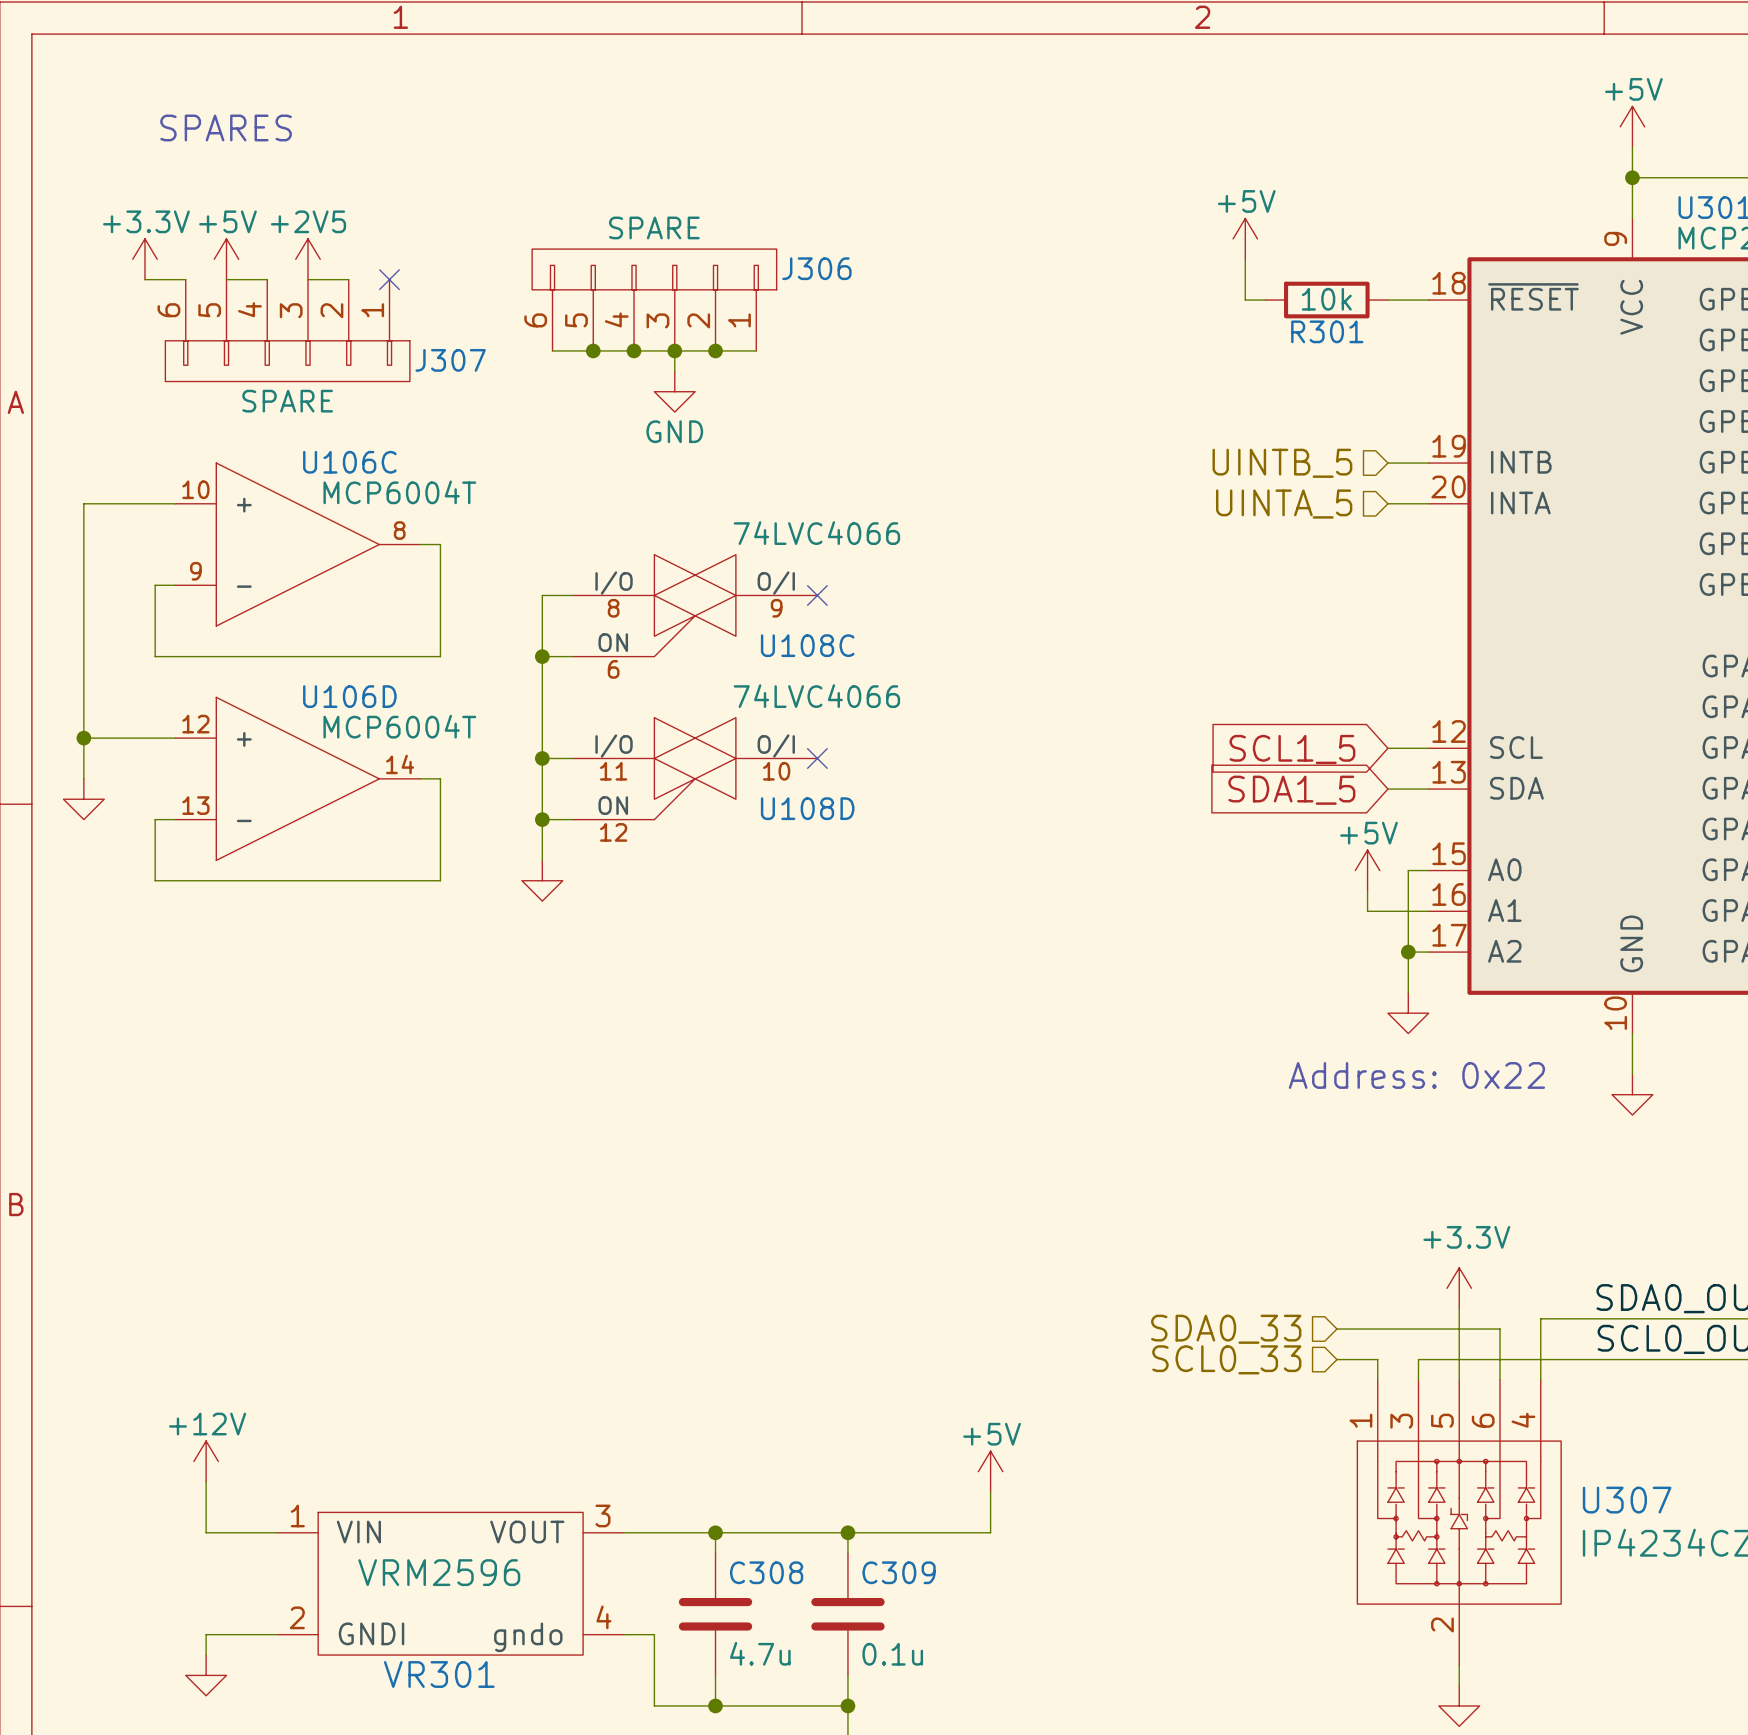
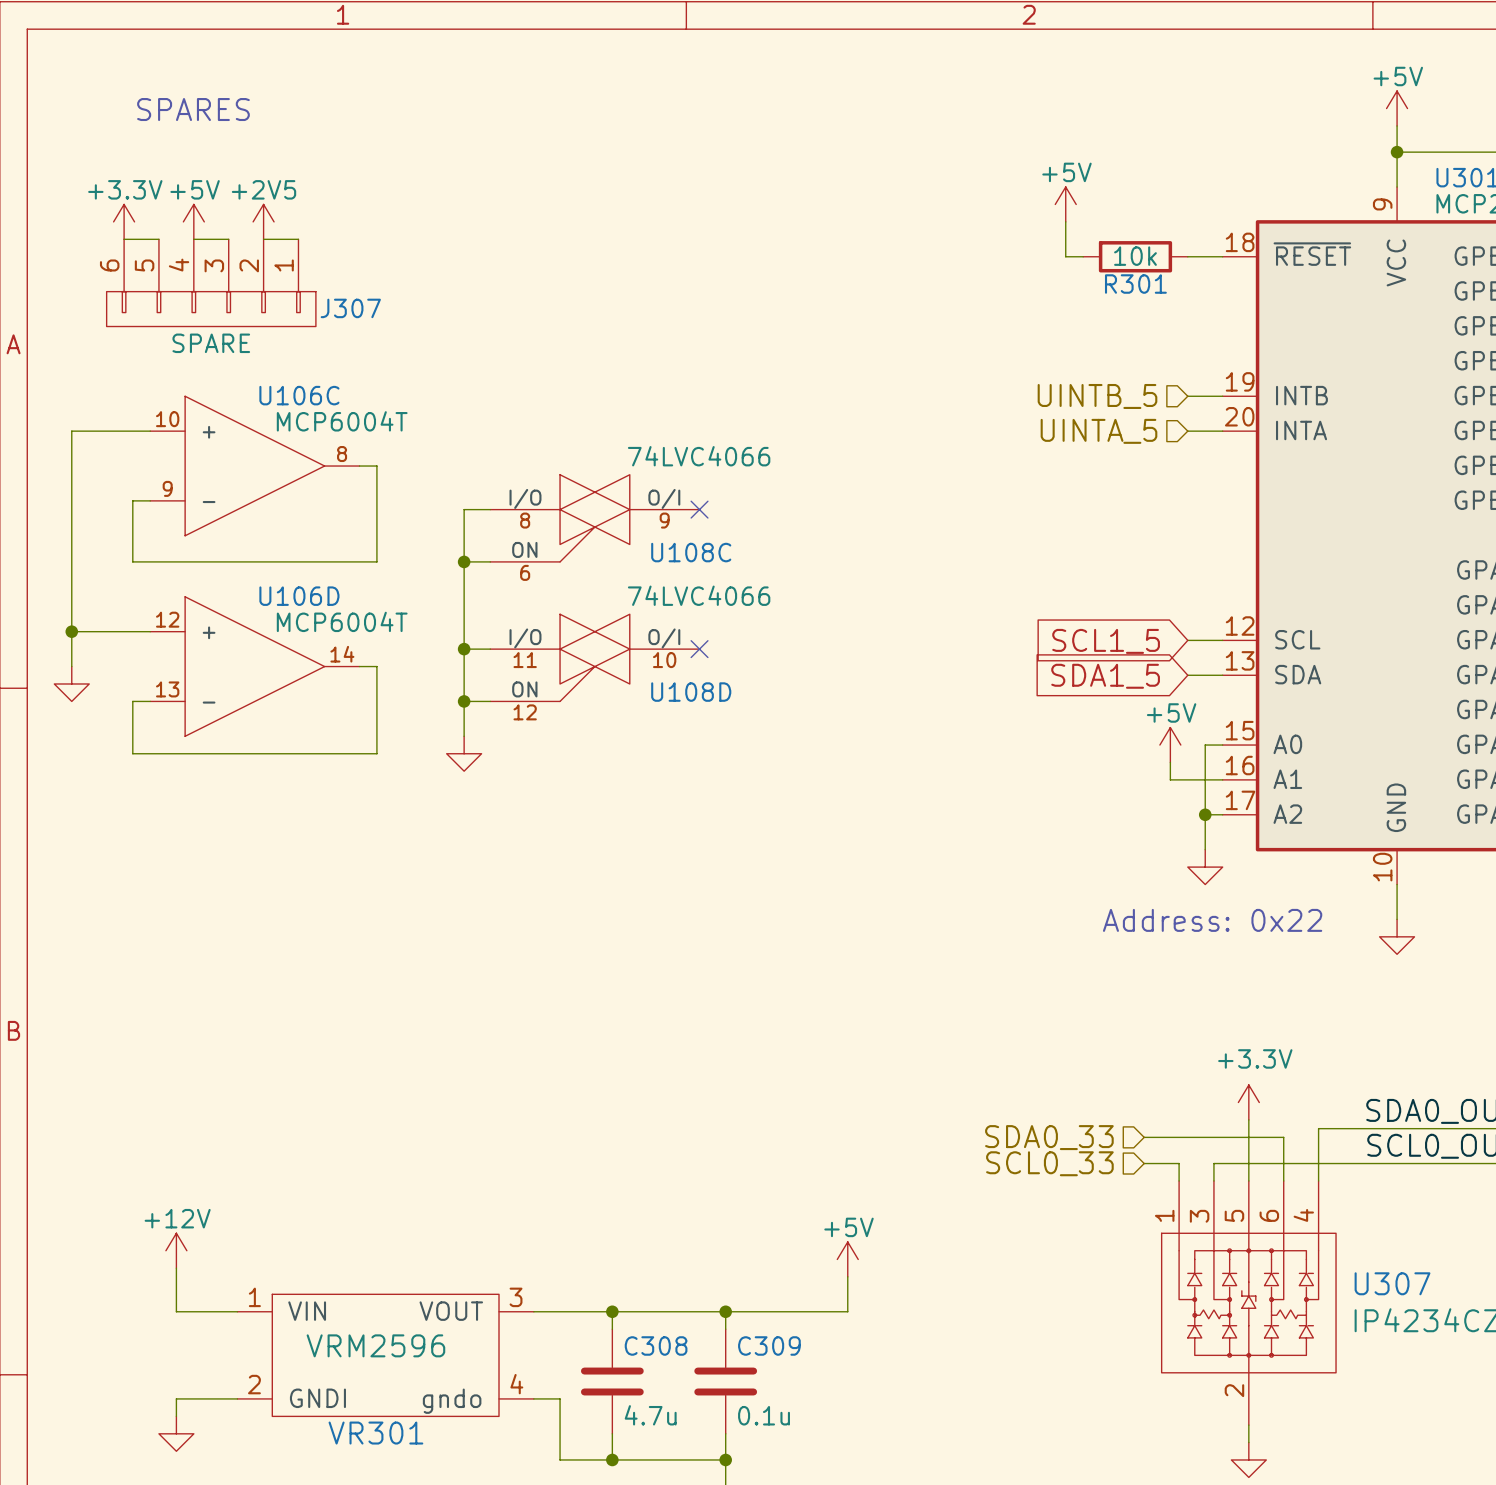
no-connect mark: (389, 279) -> none
J306: SPARE (654, 300) -> none
J307 position: (287, 330) -> (211, 282)
wire: (552, 350) (756, 350) -> none
junction: (593, 350) -> none
junction: (634, 350) -> none
wire: (674, 350) (674, 371) -> none
junction: (674, 350) -> none
junction: (715, 350) -> none
power symbol: GND (674, 391) -> none

